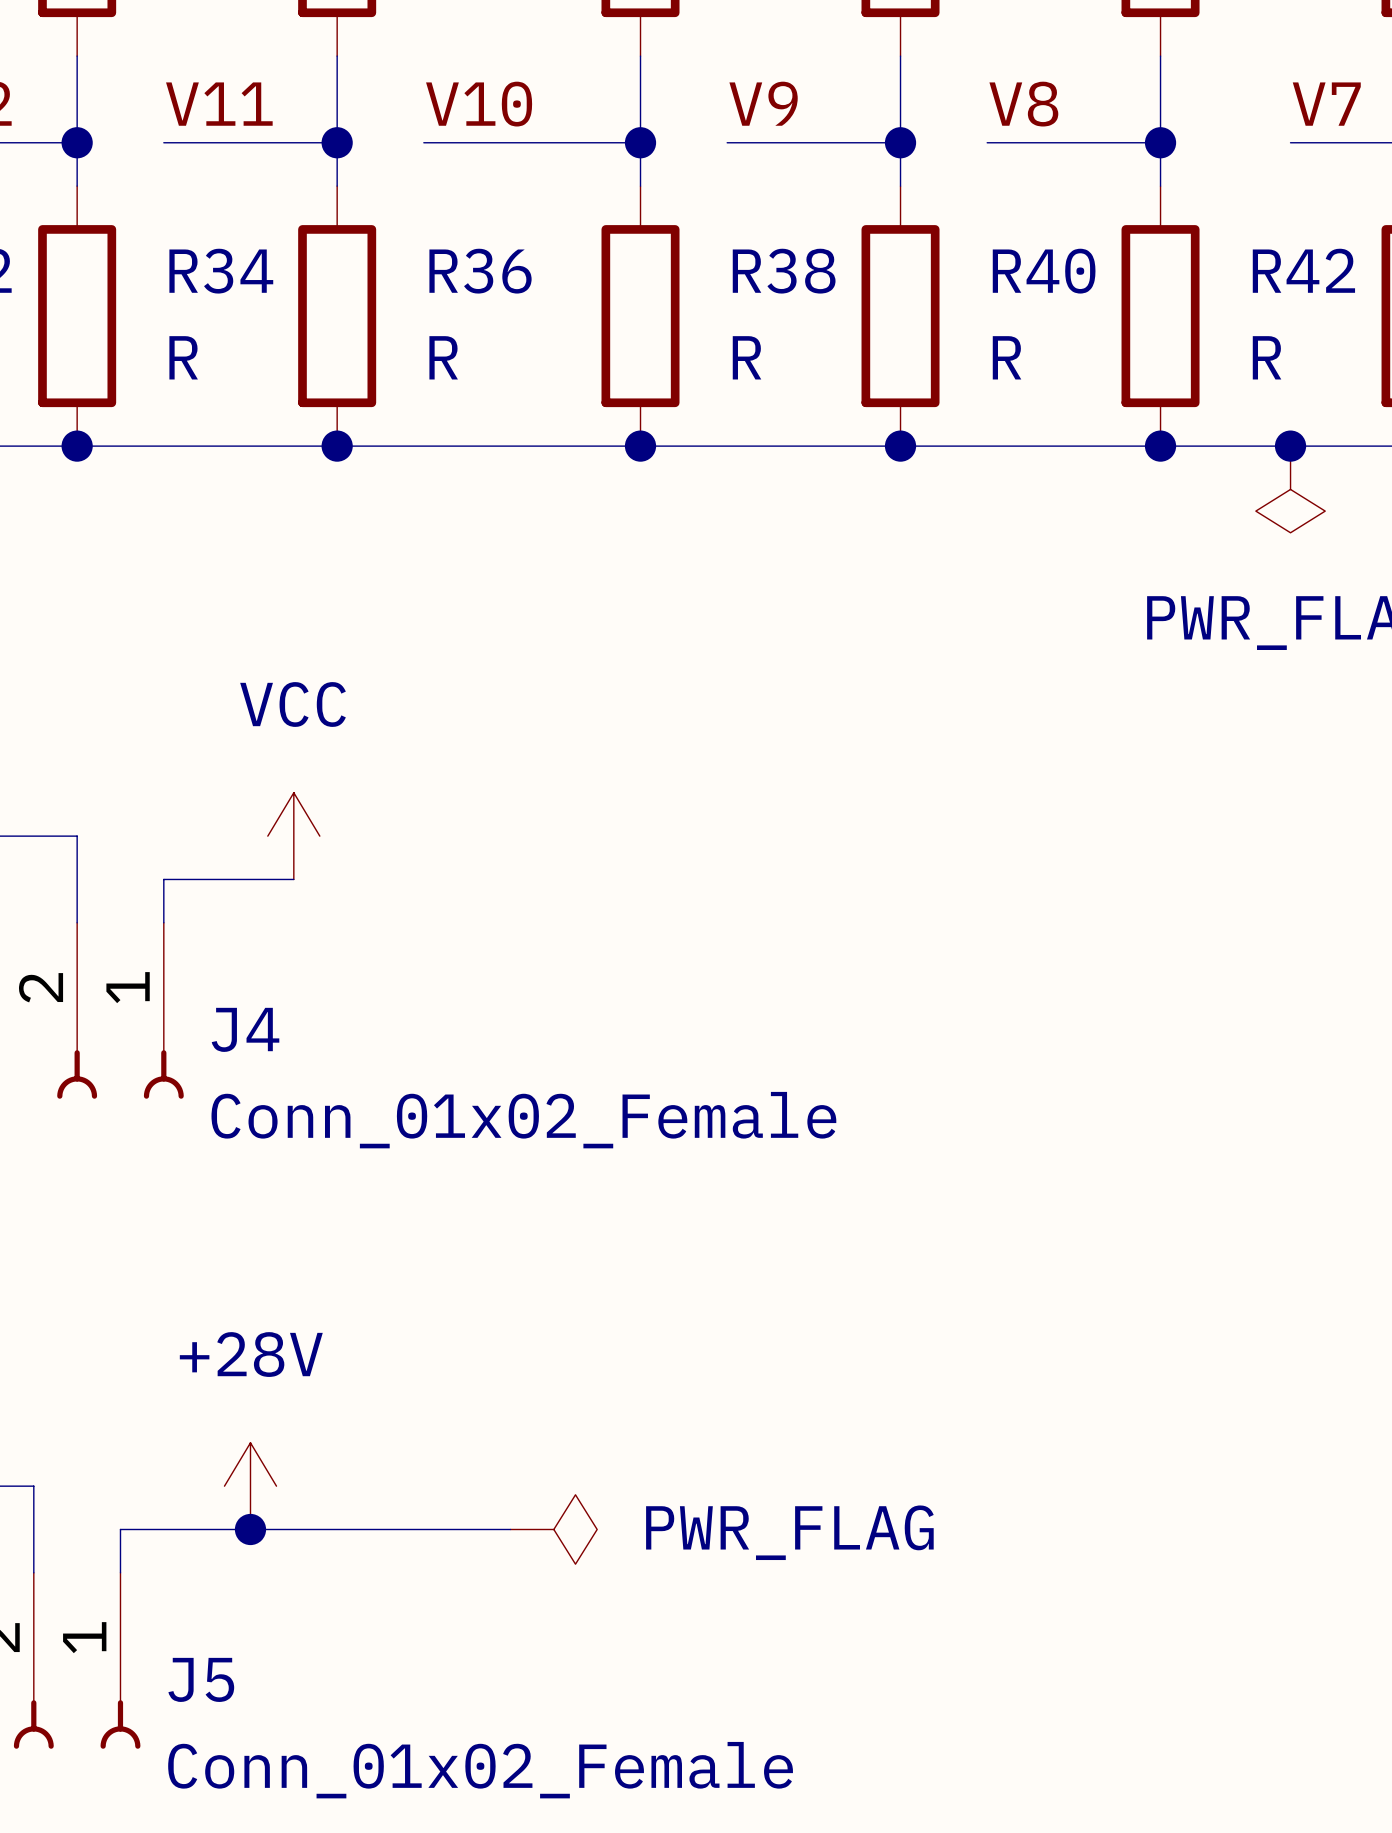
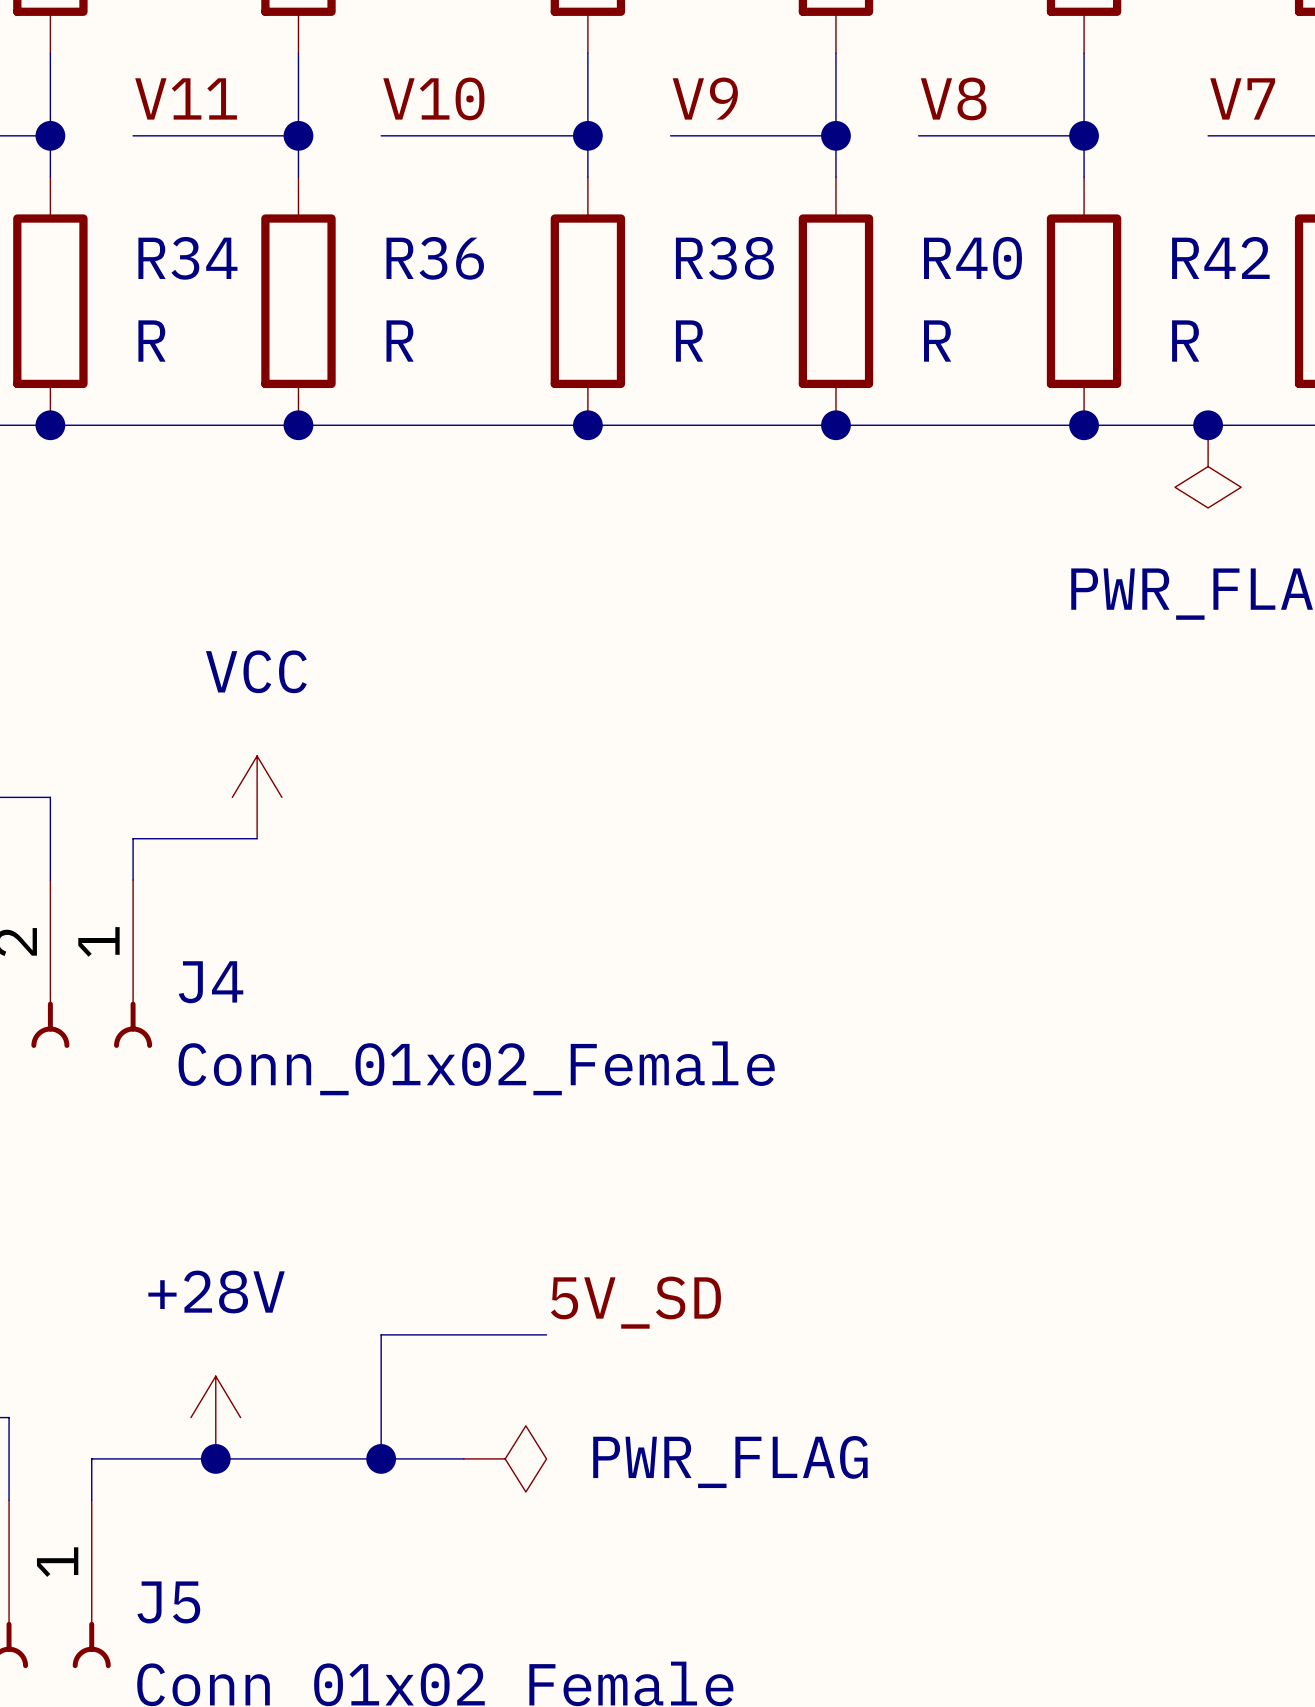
label: none -> 5V_SD (635, 1302)
wire: none -> (546, 1334) (381, 1334) (381, 1458)
junction: none -> (381, 1458)

